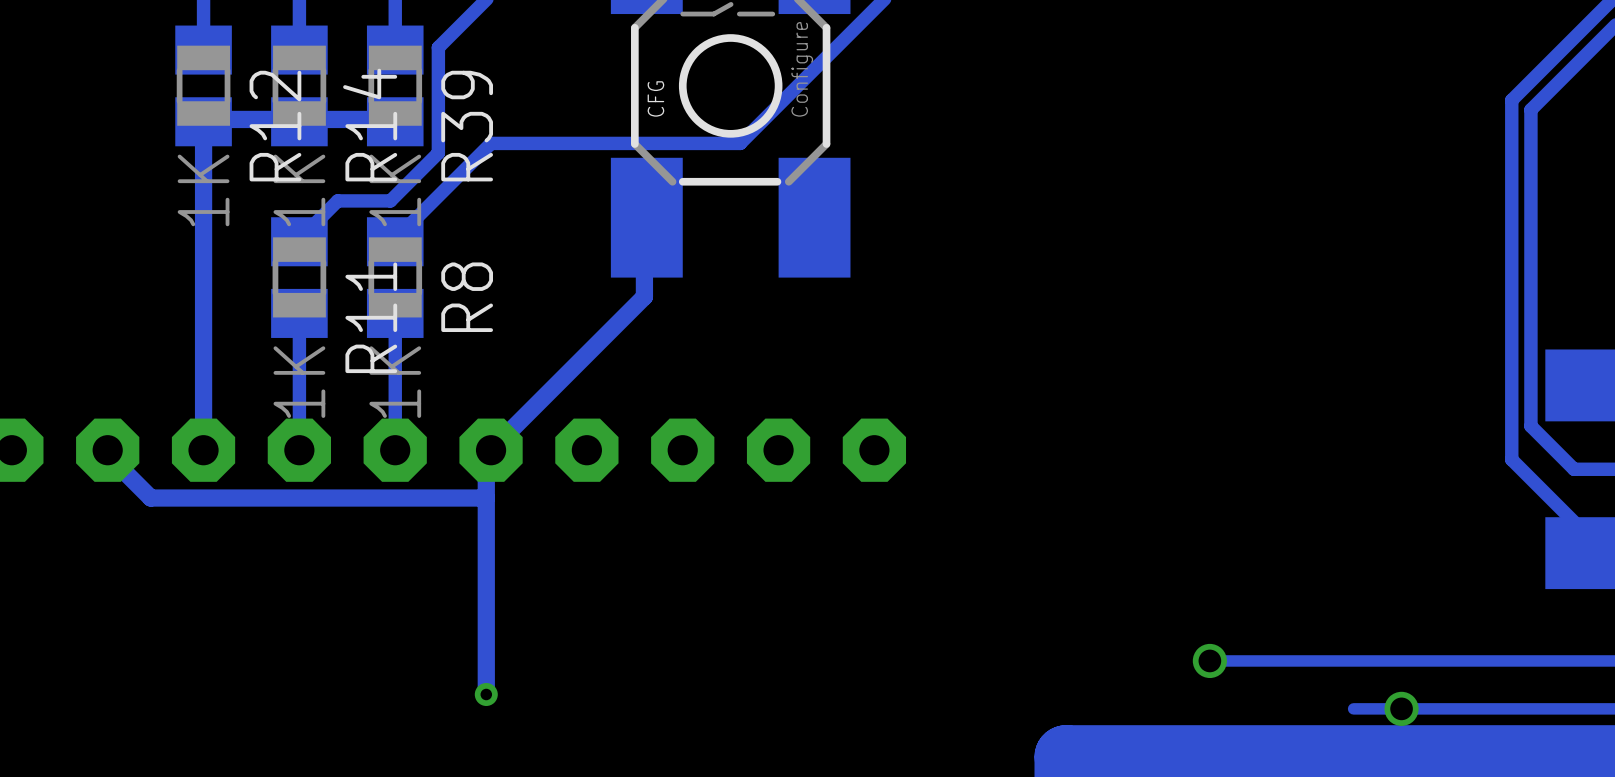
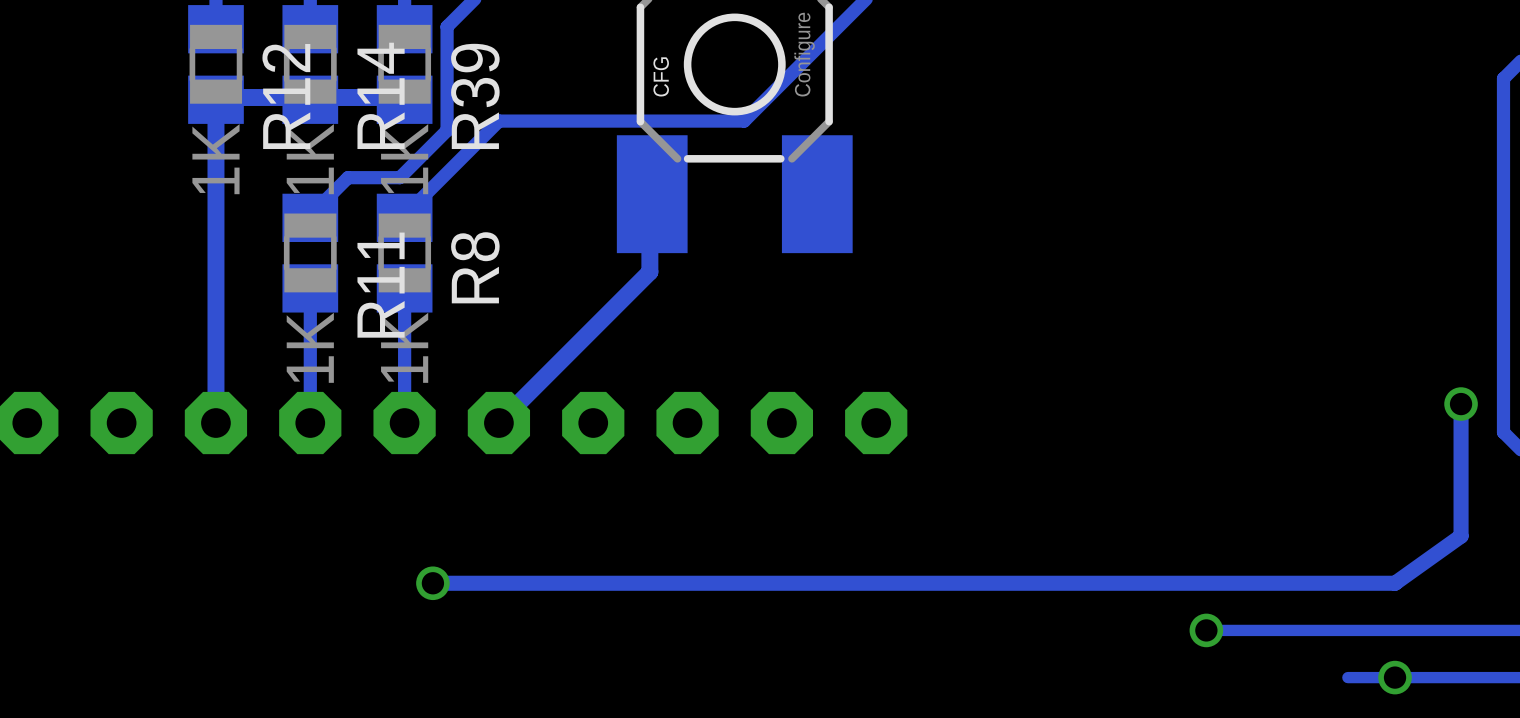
track: none -> (1461, 404) (1461, 536) (1395, 583) (432, 583)
via: none -> (1461, 404)
track: (107, 450) (107, 454) (150, 498) (486, 498) -> none
track: (491, 450) (486, 454) (486, 694) -> none
via: none -> (432, 583)
via: (486, 694) -> none

